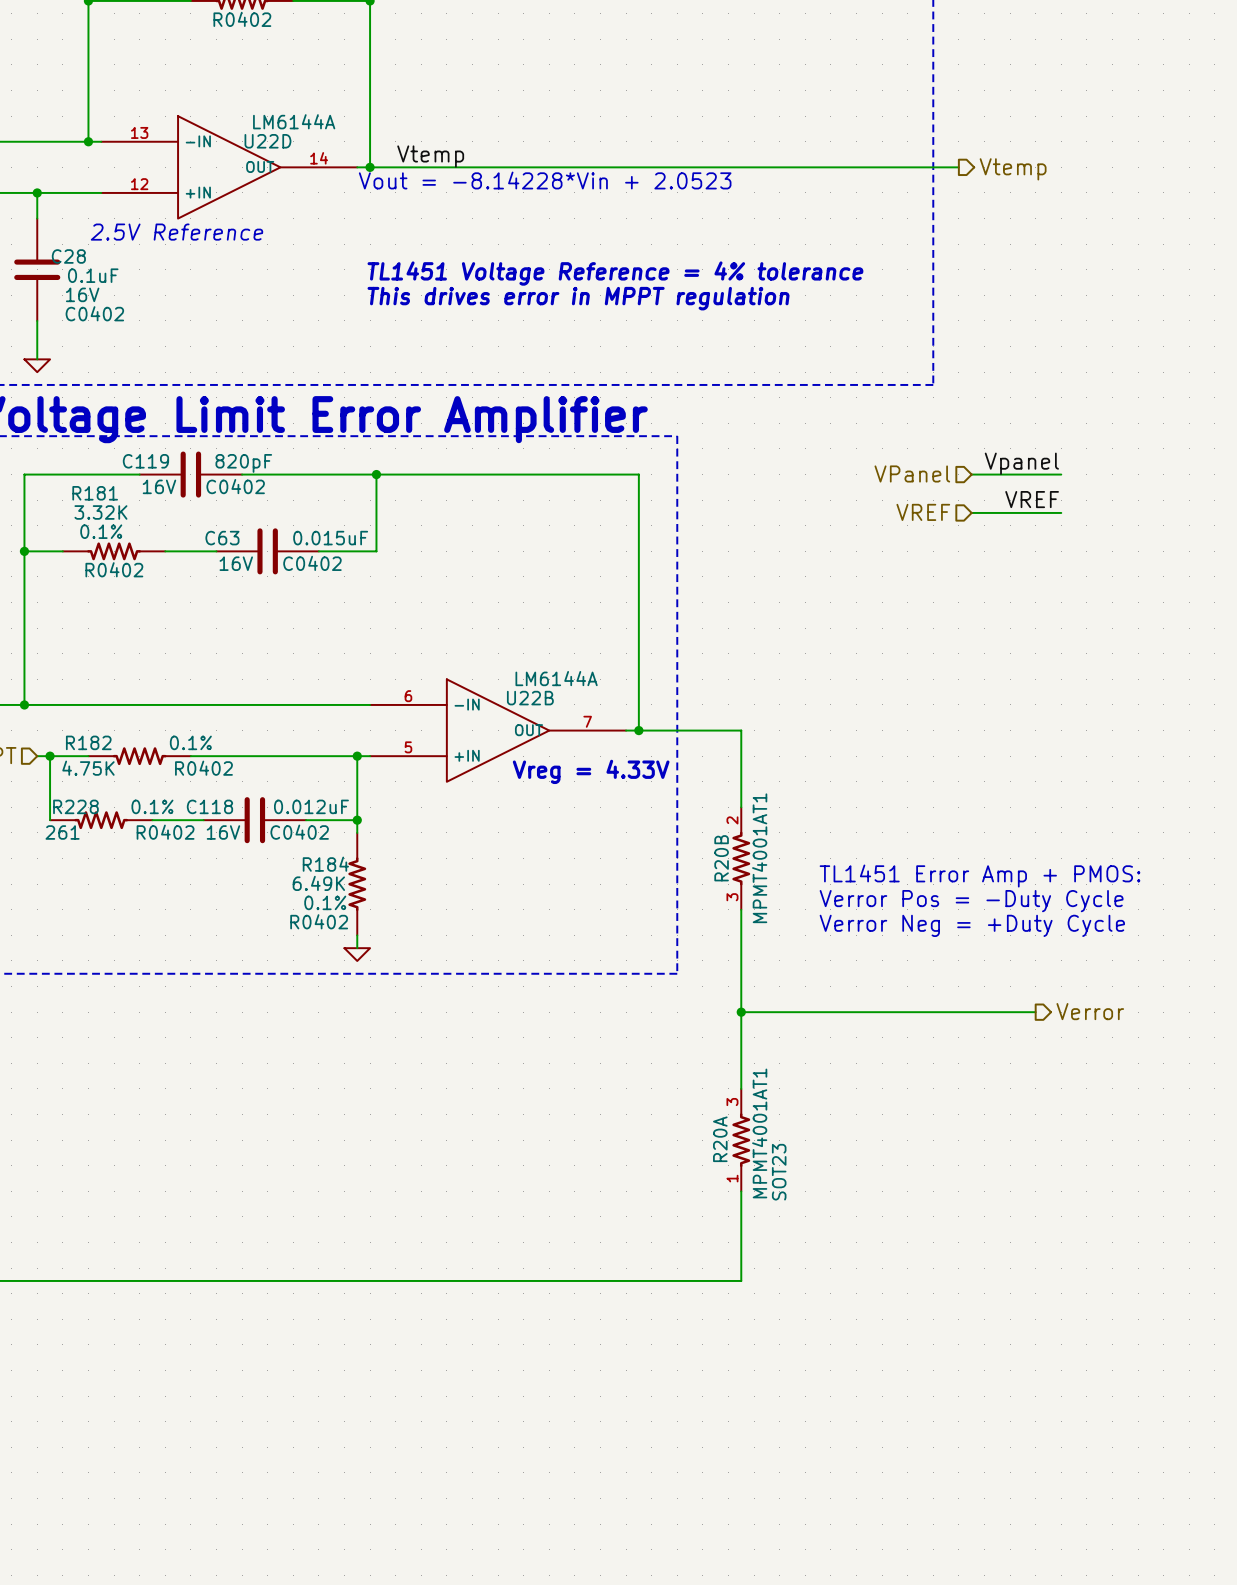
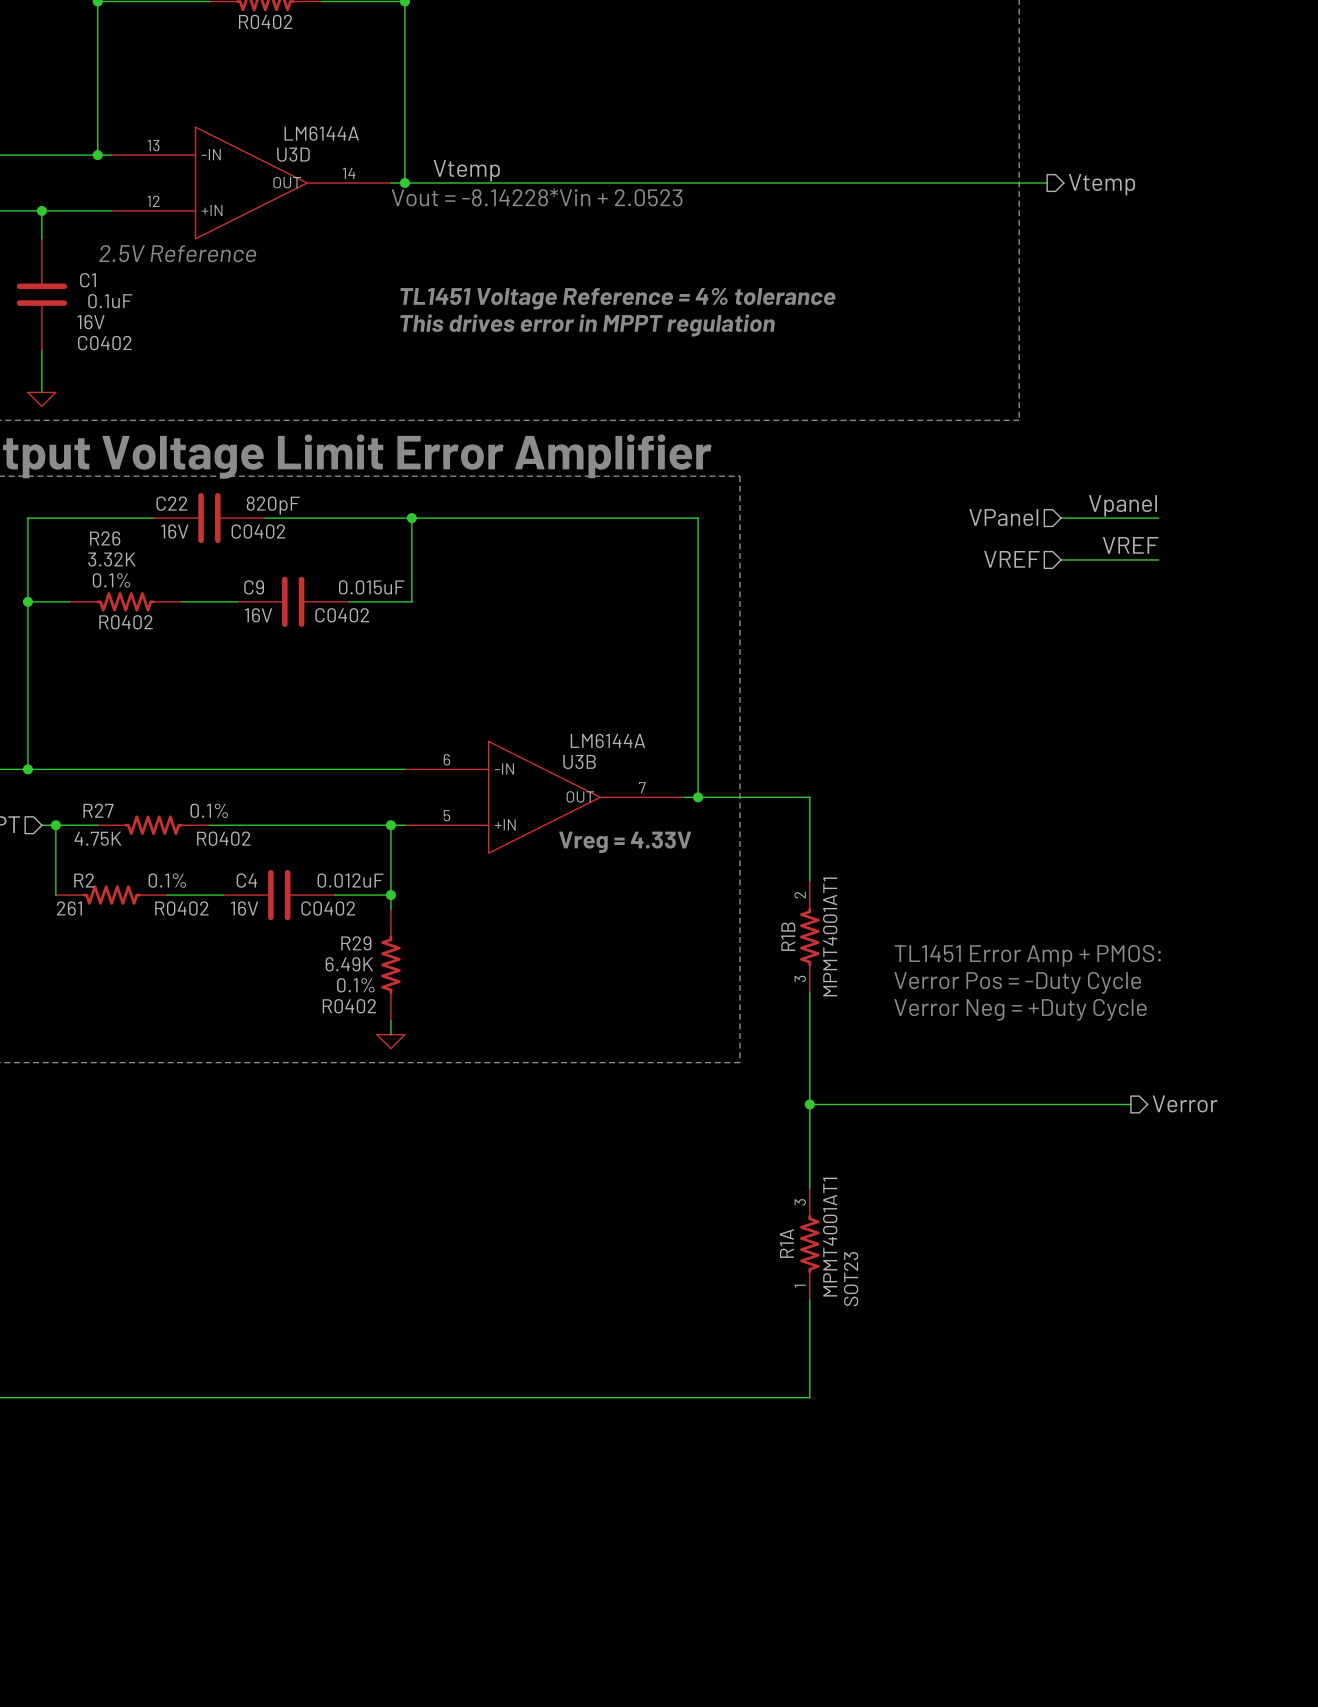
U22D name: U22D (267, 141) -> U3D (293, 154)
C28 name: C28 (68, 256) -> C1 (88, 280)
C119 name: C119 (145, 461) -> C22 (171, 503)
R181 name: R181 (95, 493) -> R26 (105, 538)
C63 name: C63 (222, 538) -> C9 (254, 587)
U22B name: U22B (530, 698) -> U3B (579, 761)
R182 name: R182 (88, 742) -> R27 (98, 810)
R228 name: R228 (75, 806) -> R2 (84, 880)
C118 name: C118 (209, 806) -> C4 (246, 880)
R20B name: R20B (721, 858) -> R1B (788, 936)
R184 name: R184 (325, 864) -> R29 (356, 943)
R20A name: R20A (720, 1139) -> R1A (786, 1243)

